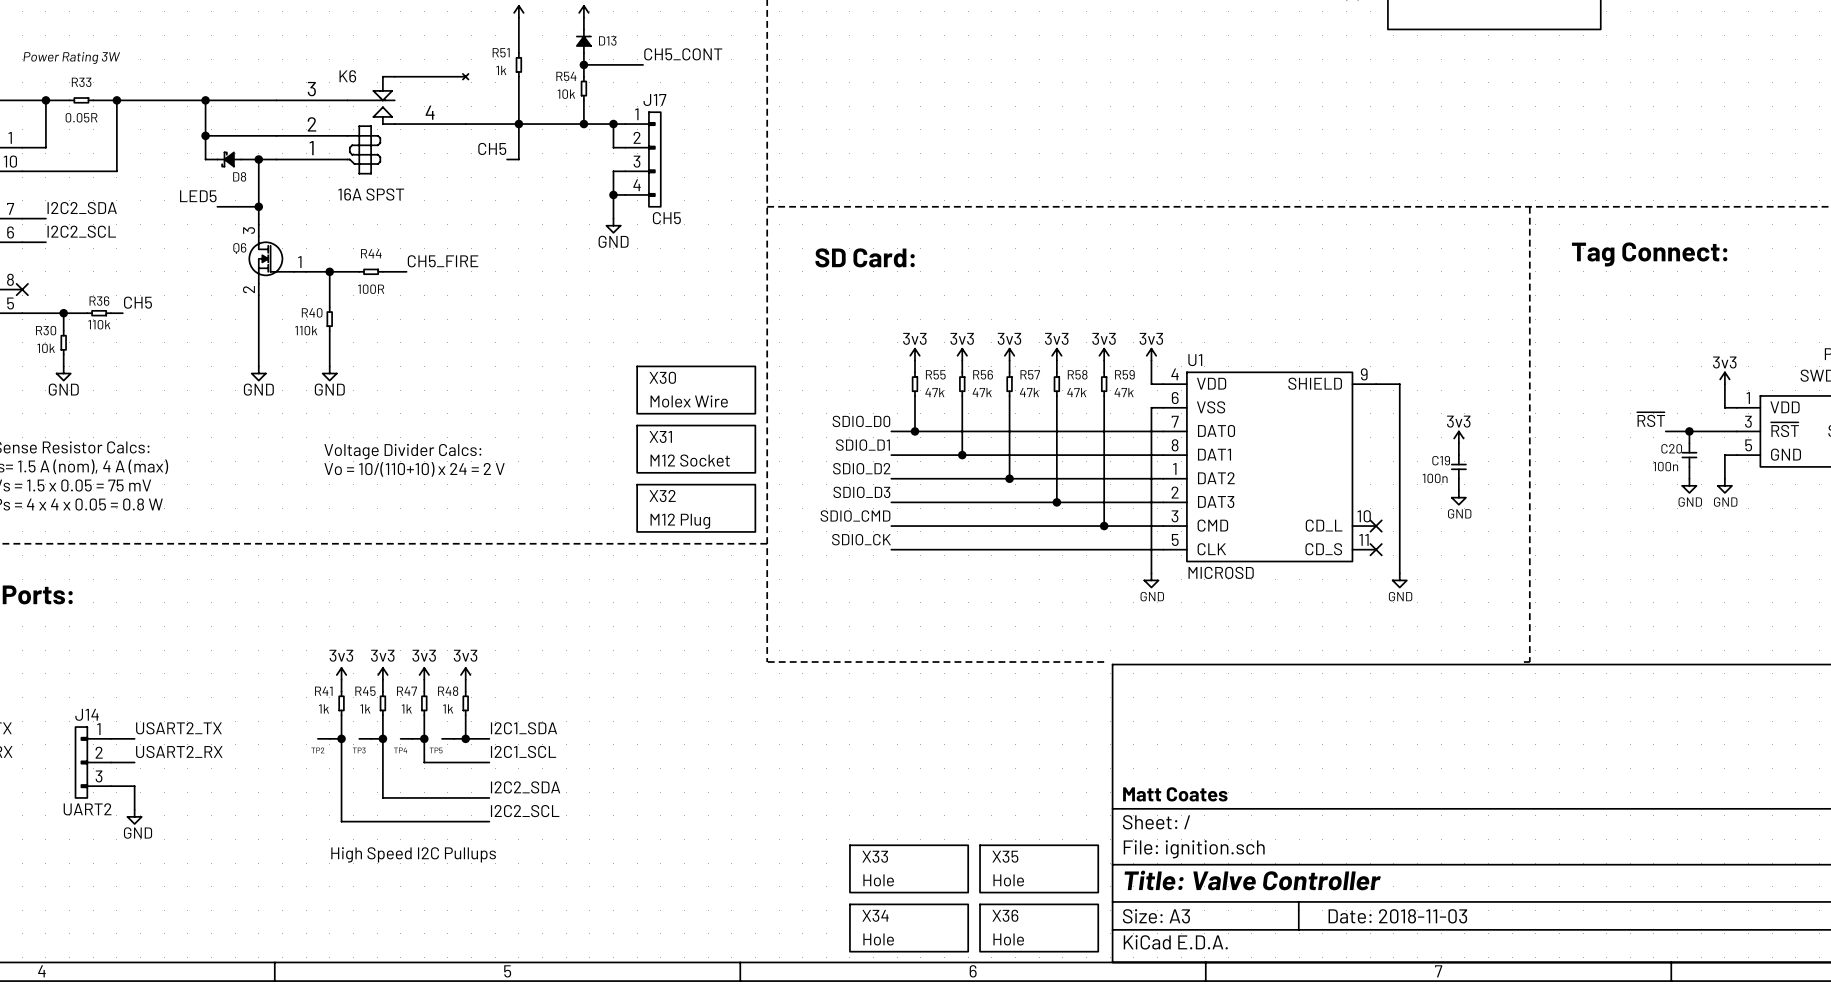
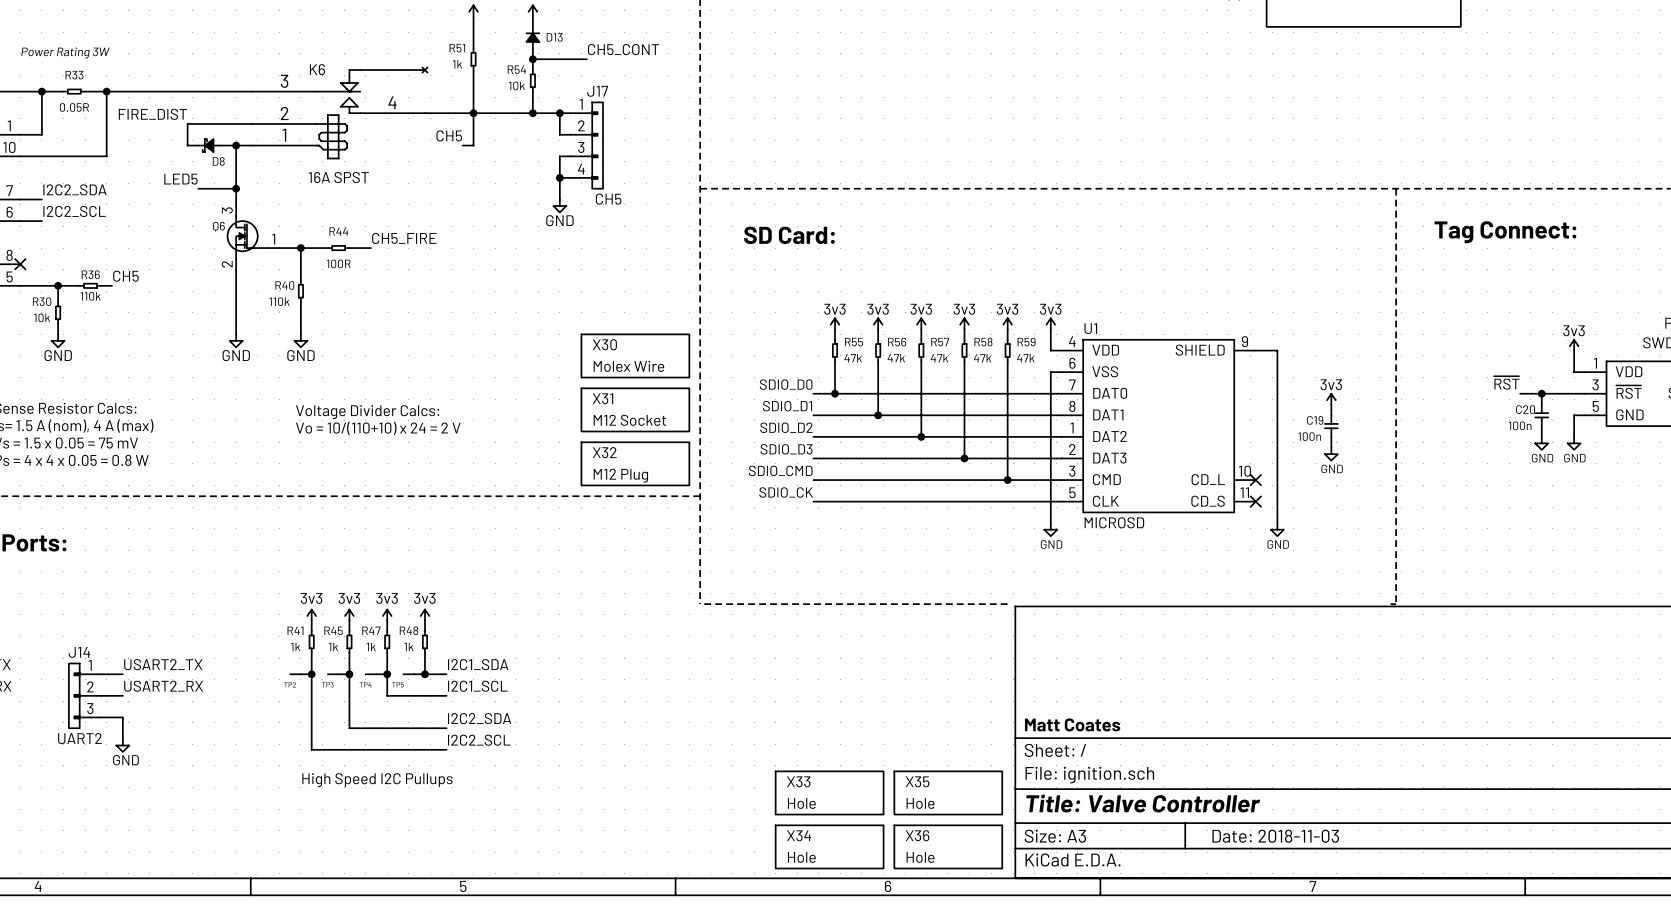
wire: (205, 100) (205, 135) -> none
junction: (205, 100) -> none
label: none -> FIRE_DIST (152, 114)
junction: (205, 135) -> none

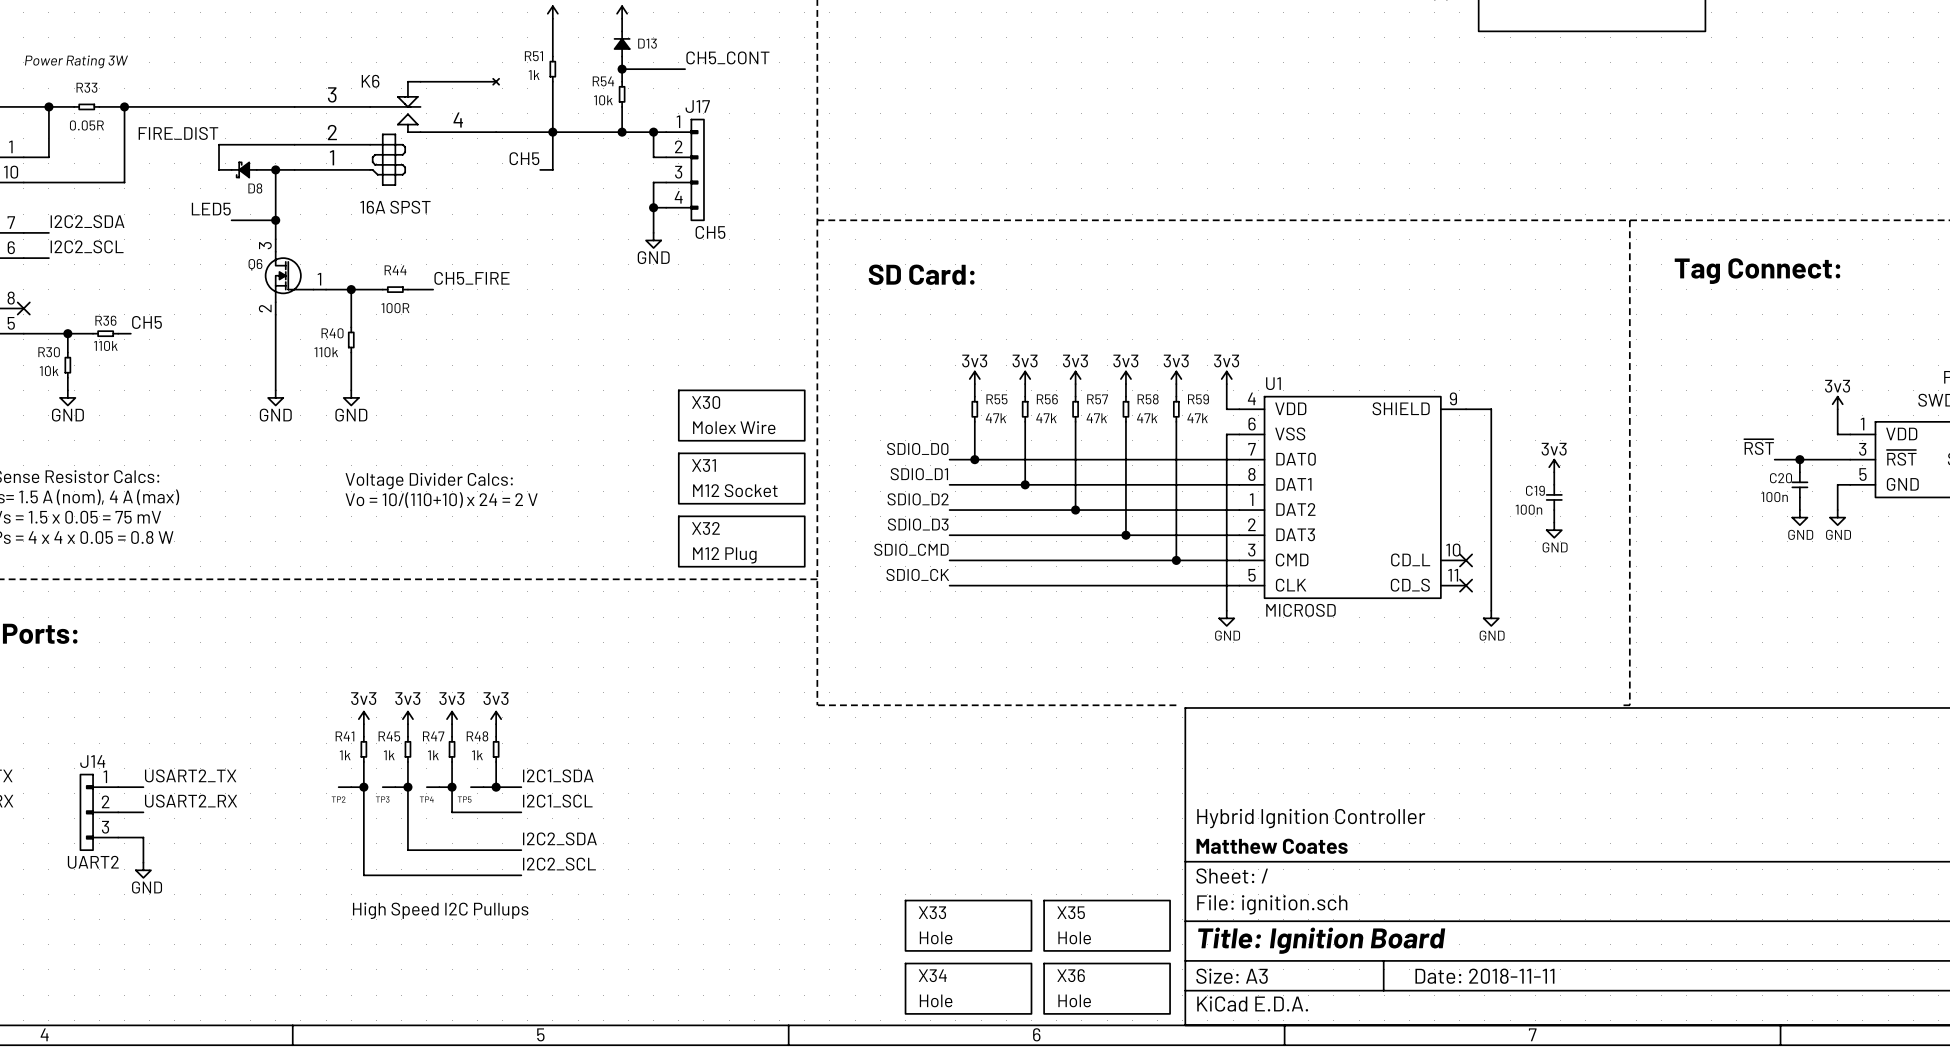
title block: none -> Hybrid Ignition Controller (1311, 818)
title block: Matt Coates (1072, 724) -> Matthew Coates (1272, 846)
title block: Title: Valve Controller (1143, 803) -> Title: Ignition Board (1321, 940)
title block: Date: 2018-11-03 (1275, 836) -> Date: 2018-11-11 (1484, 976)

